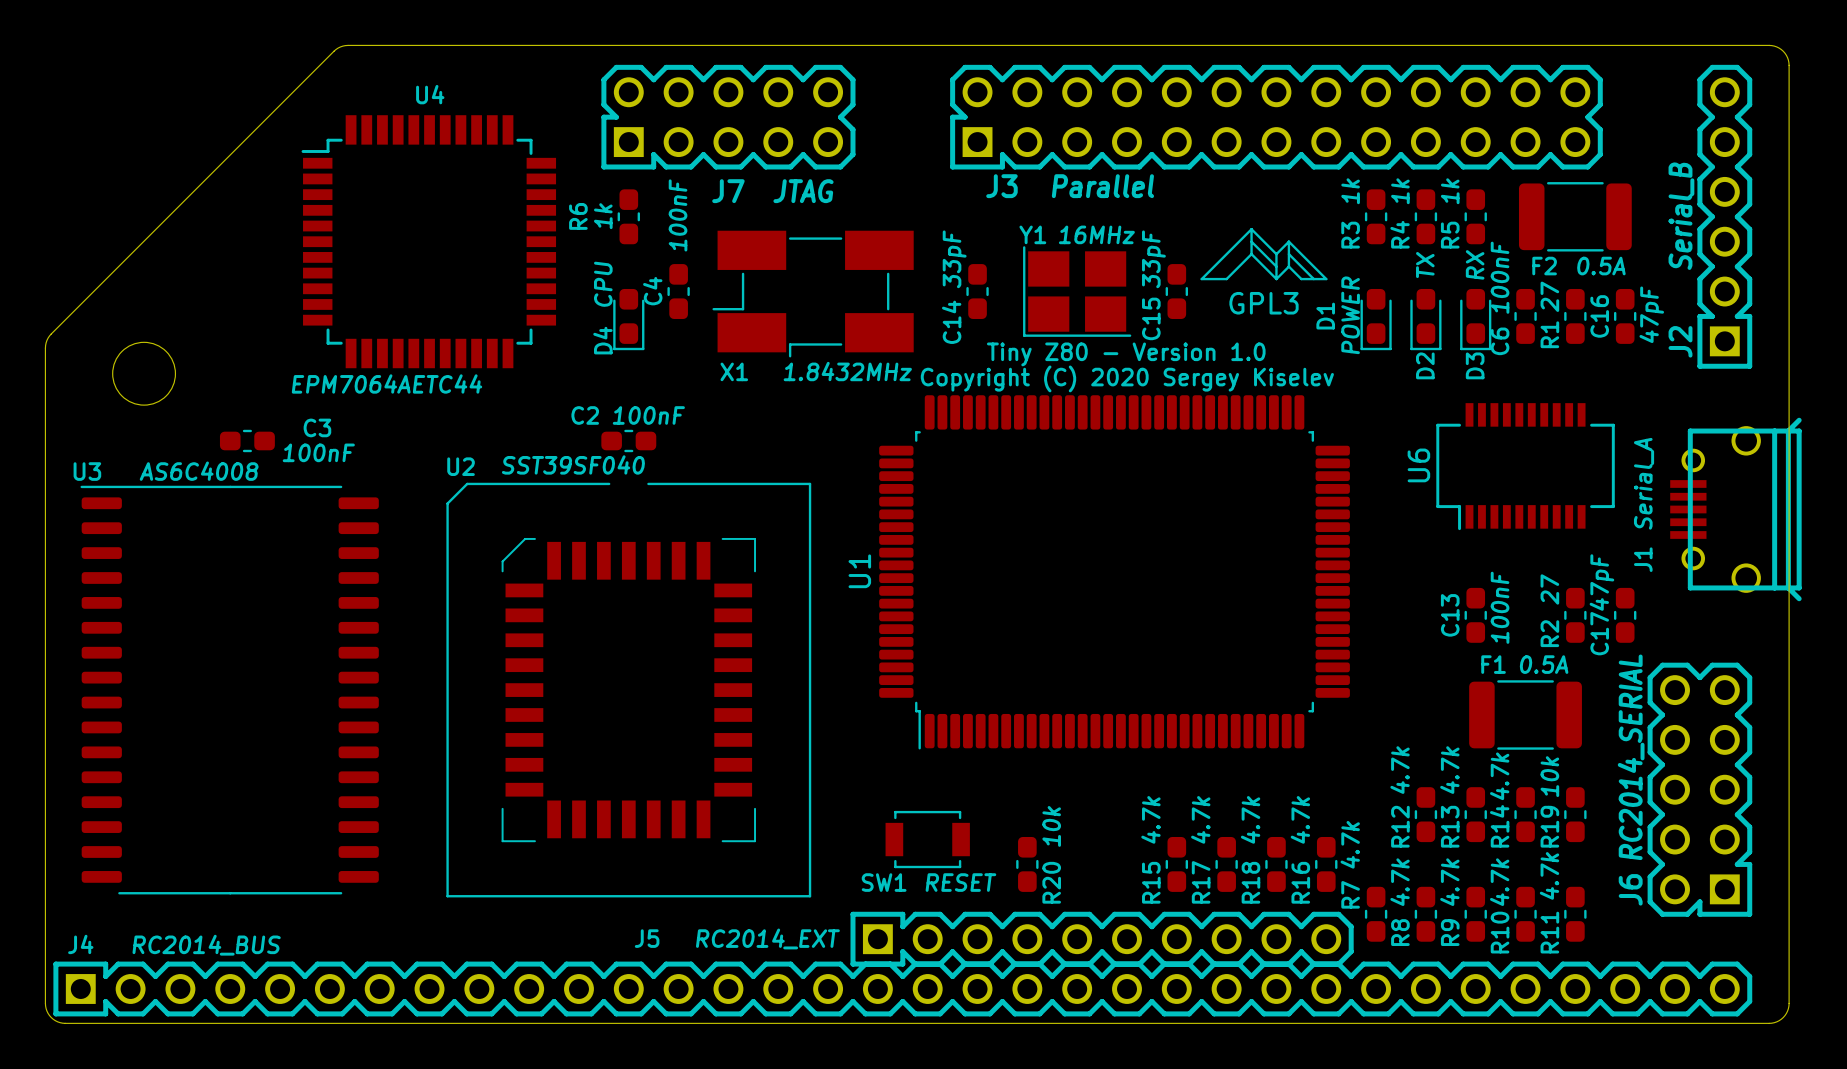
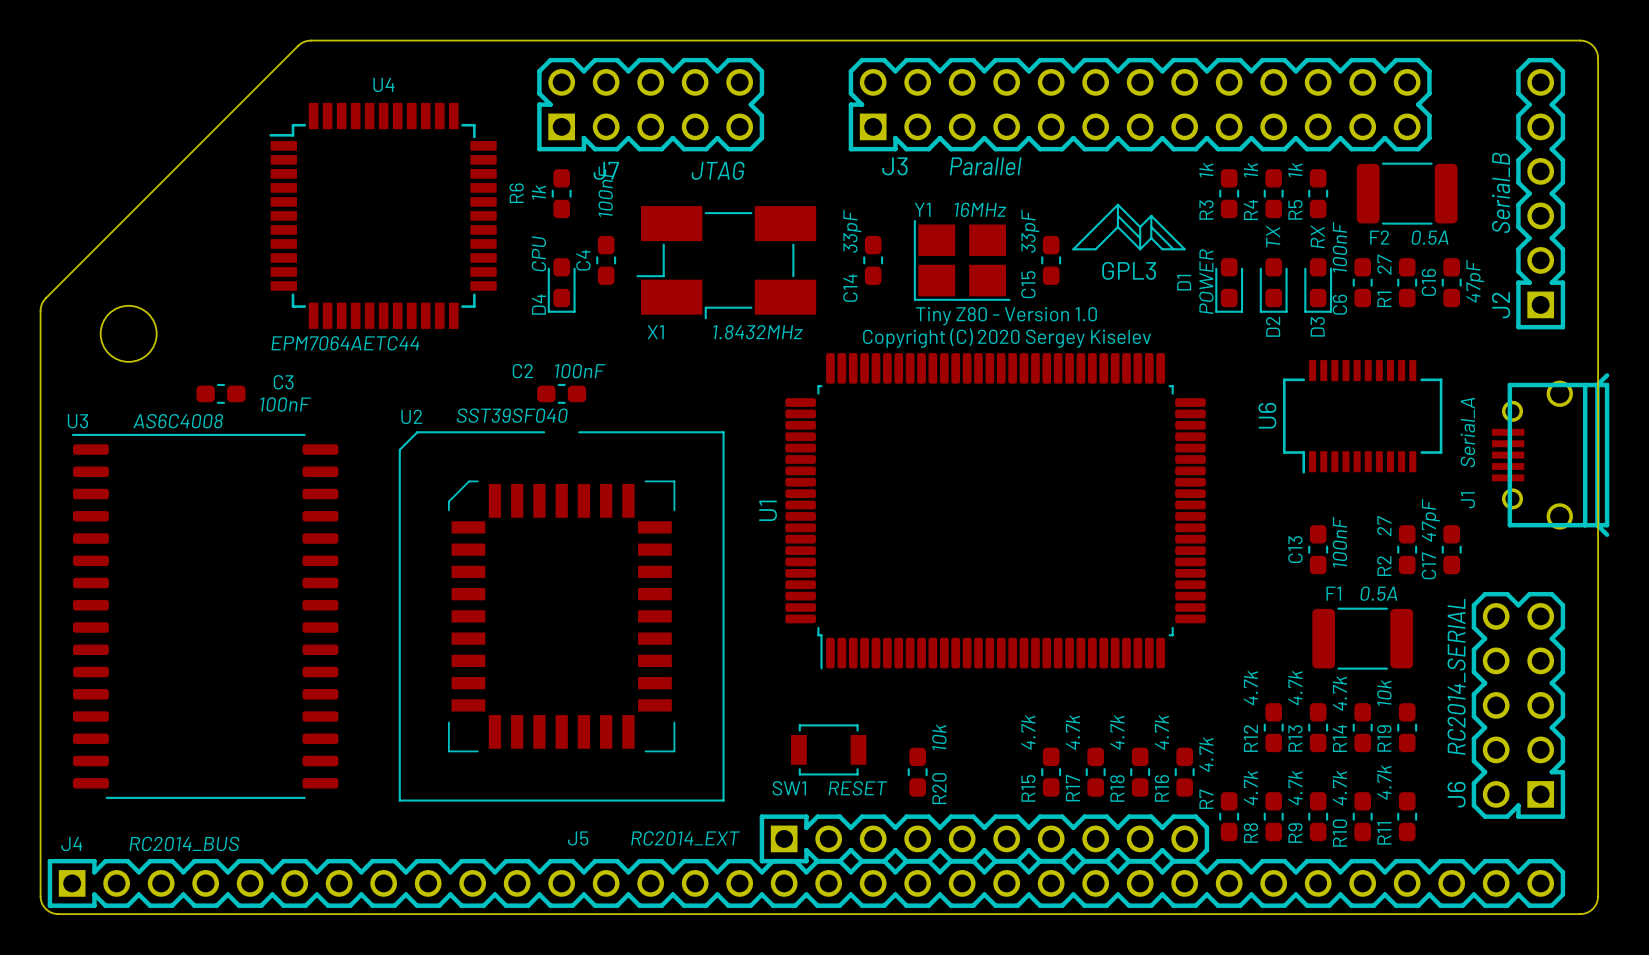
J7 name position: J7 (728, 191) -> J7 (606, 170)

